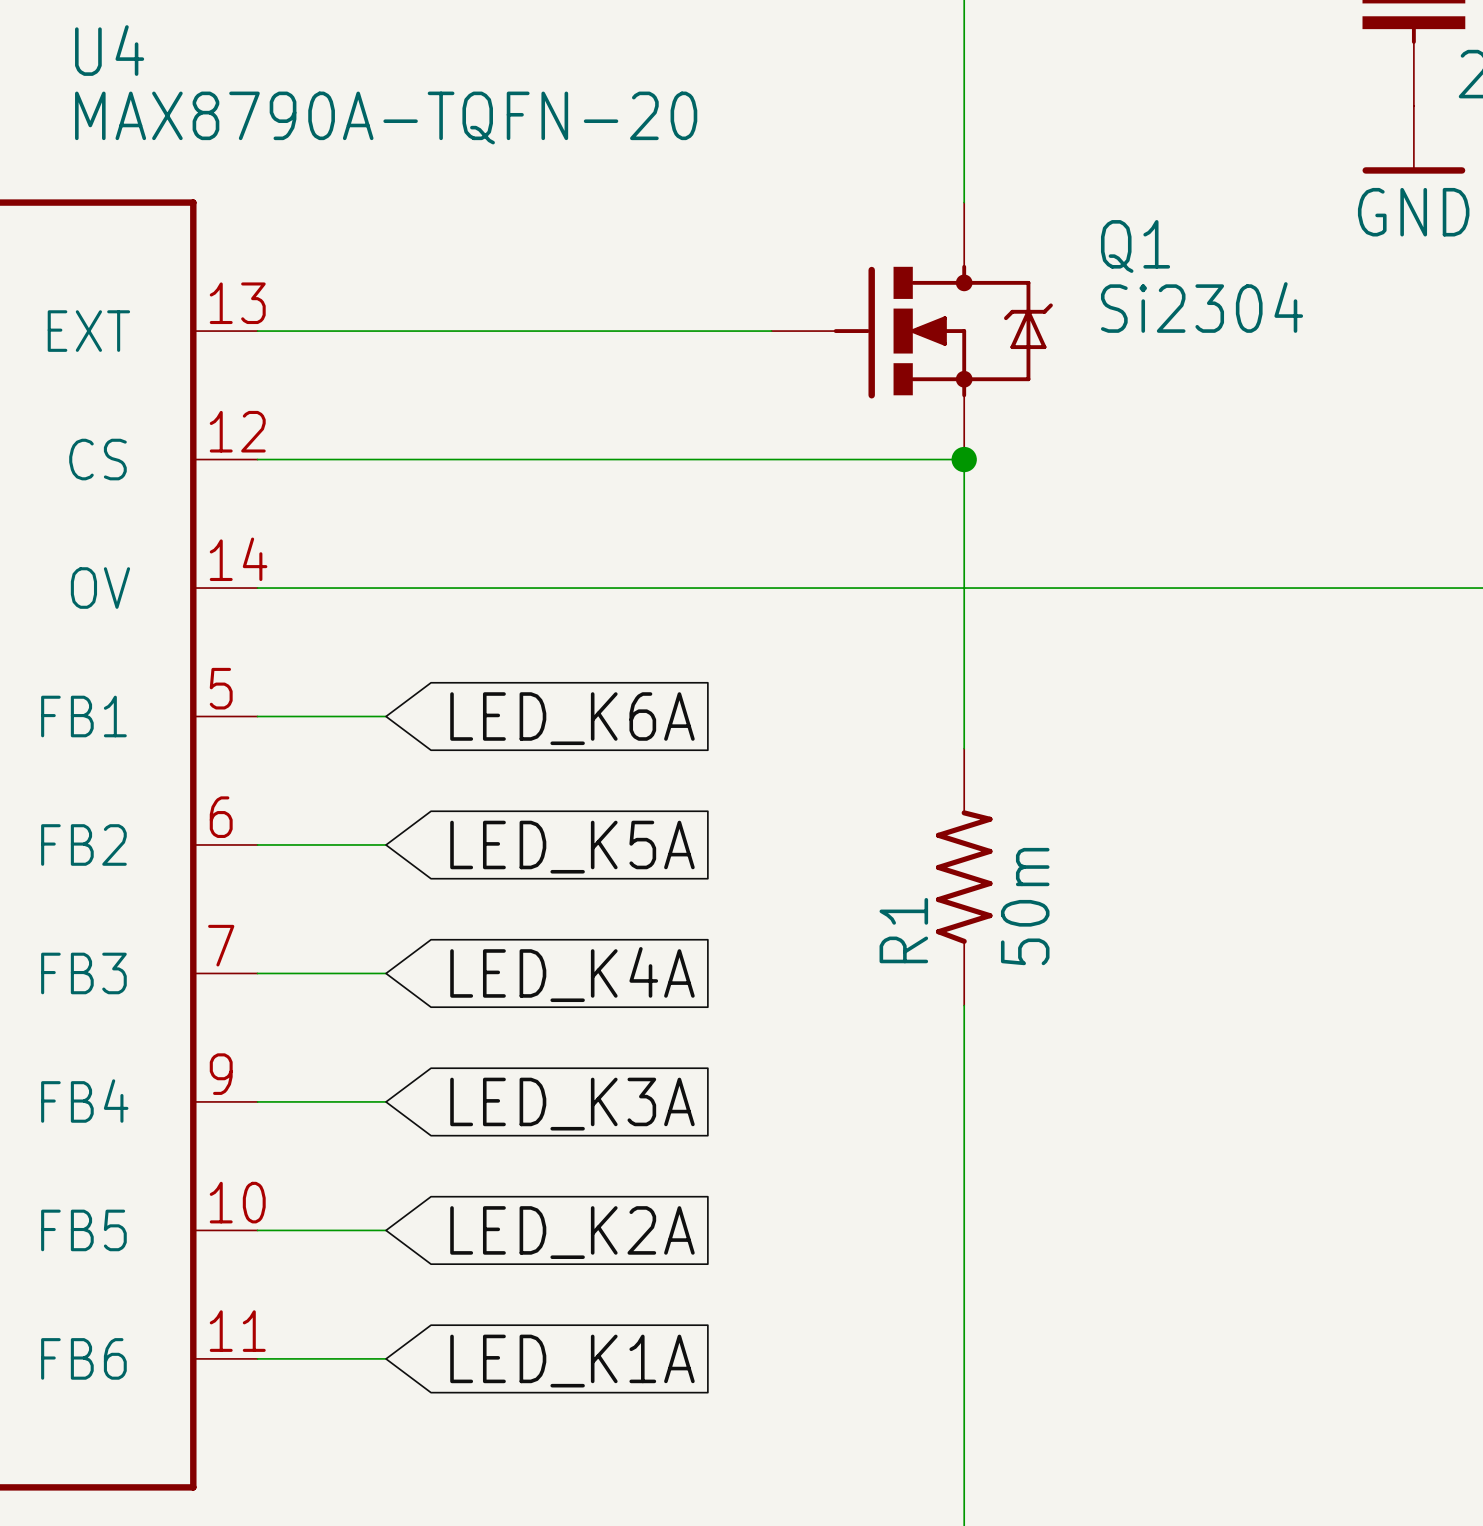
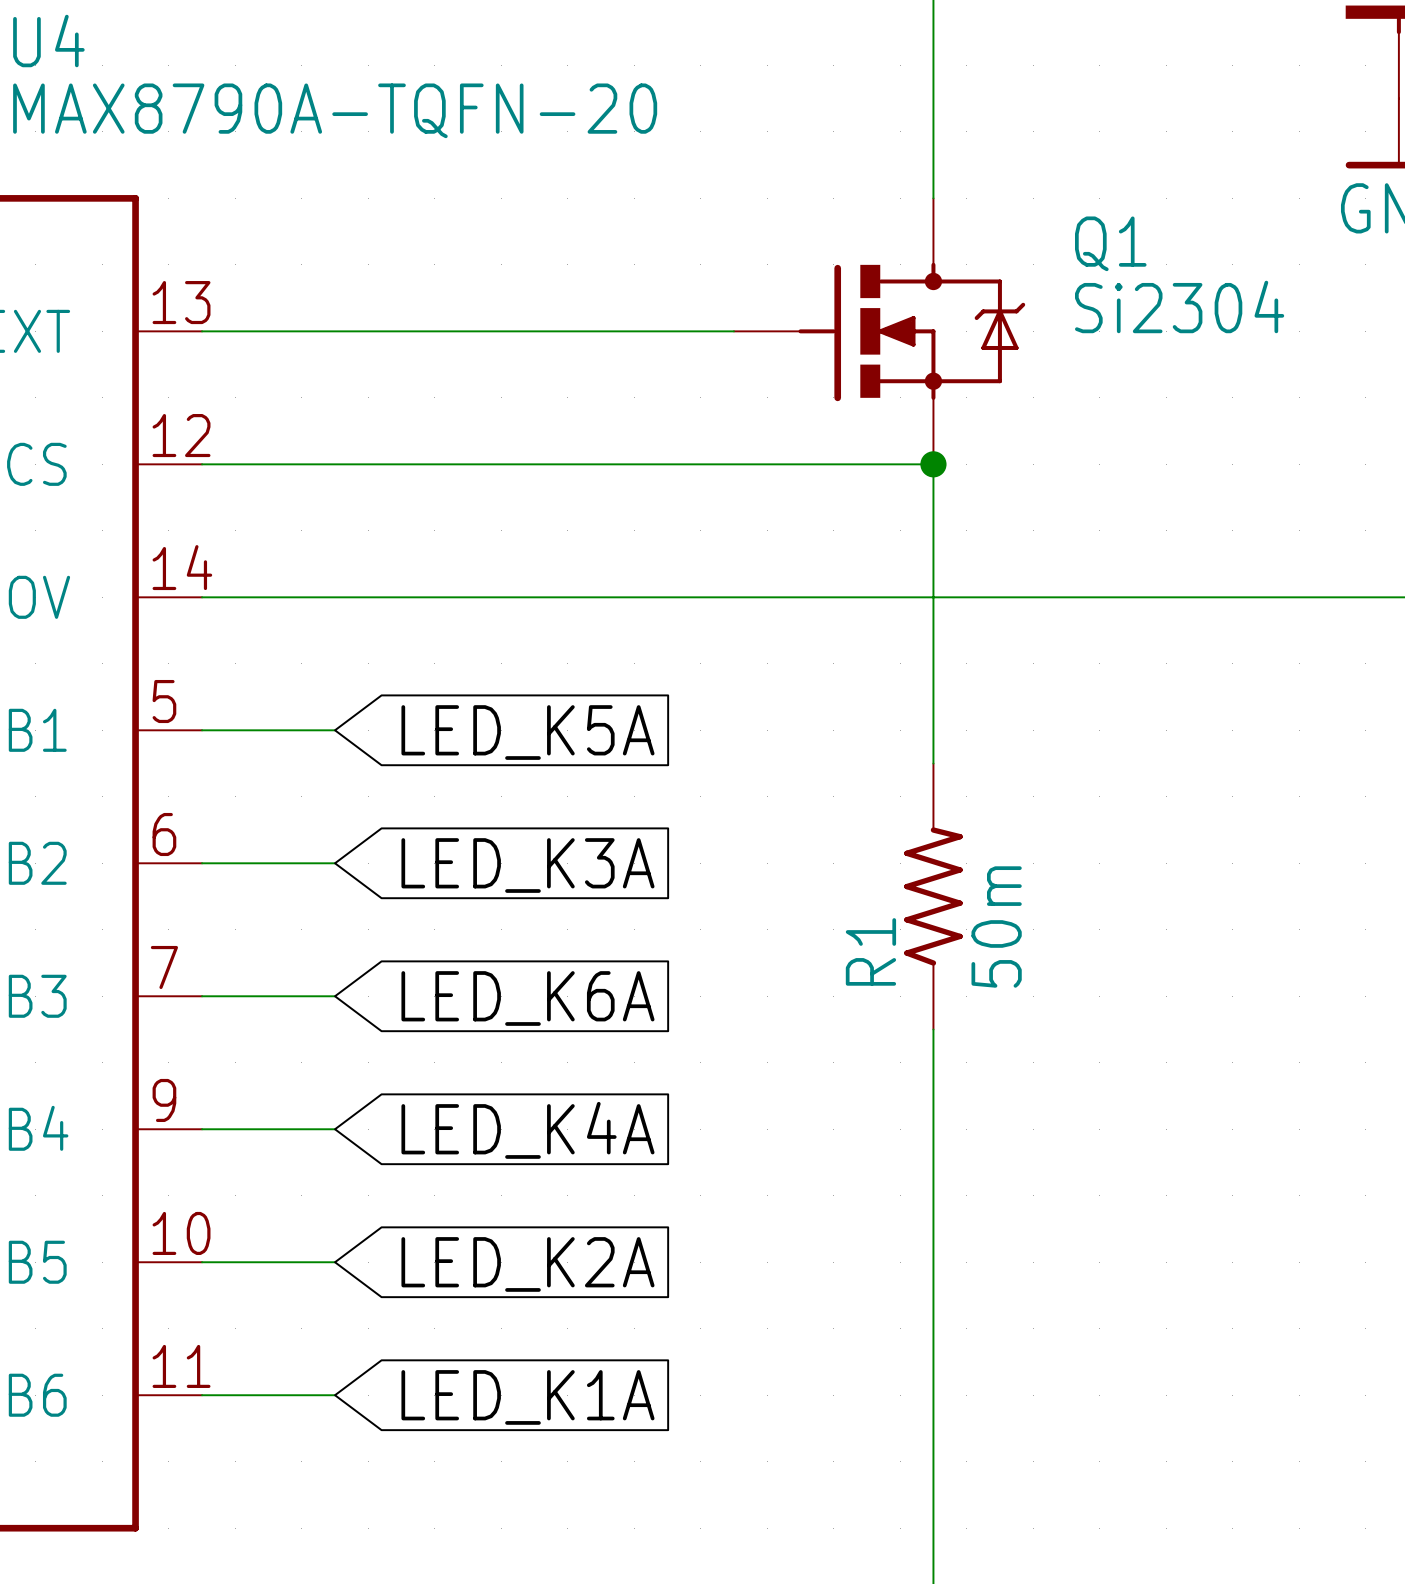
global label: LED_K6A (572, 718) -> LED_K5A (527, 732)
global label: LED_K5A (572, 847) -> LED_K3A (527, 865)
global label: LED_K4A (572, 974) -> LED_K6A (527, 998)
global label: LED_K3A (572, 1104) -> LED_K4A (527, 1130)

